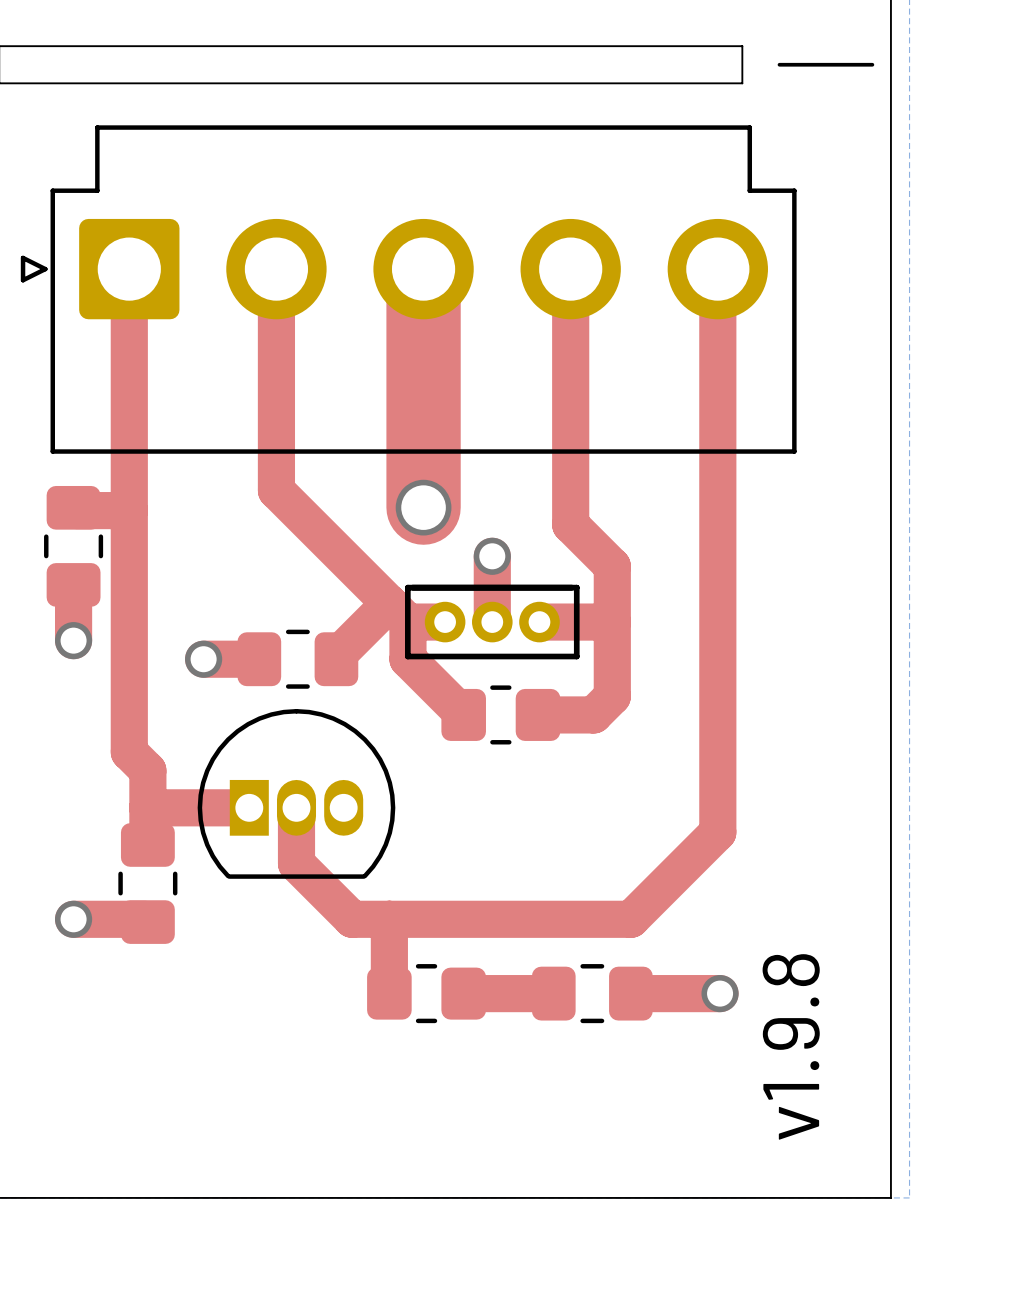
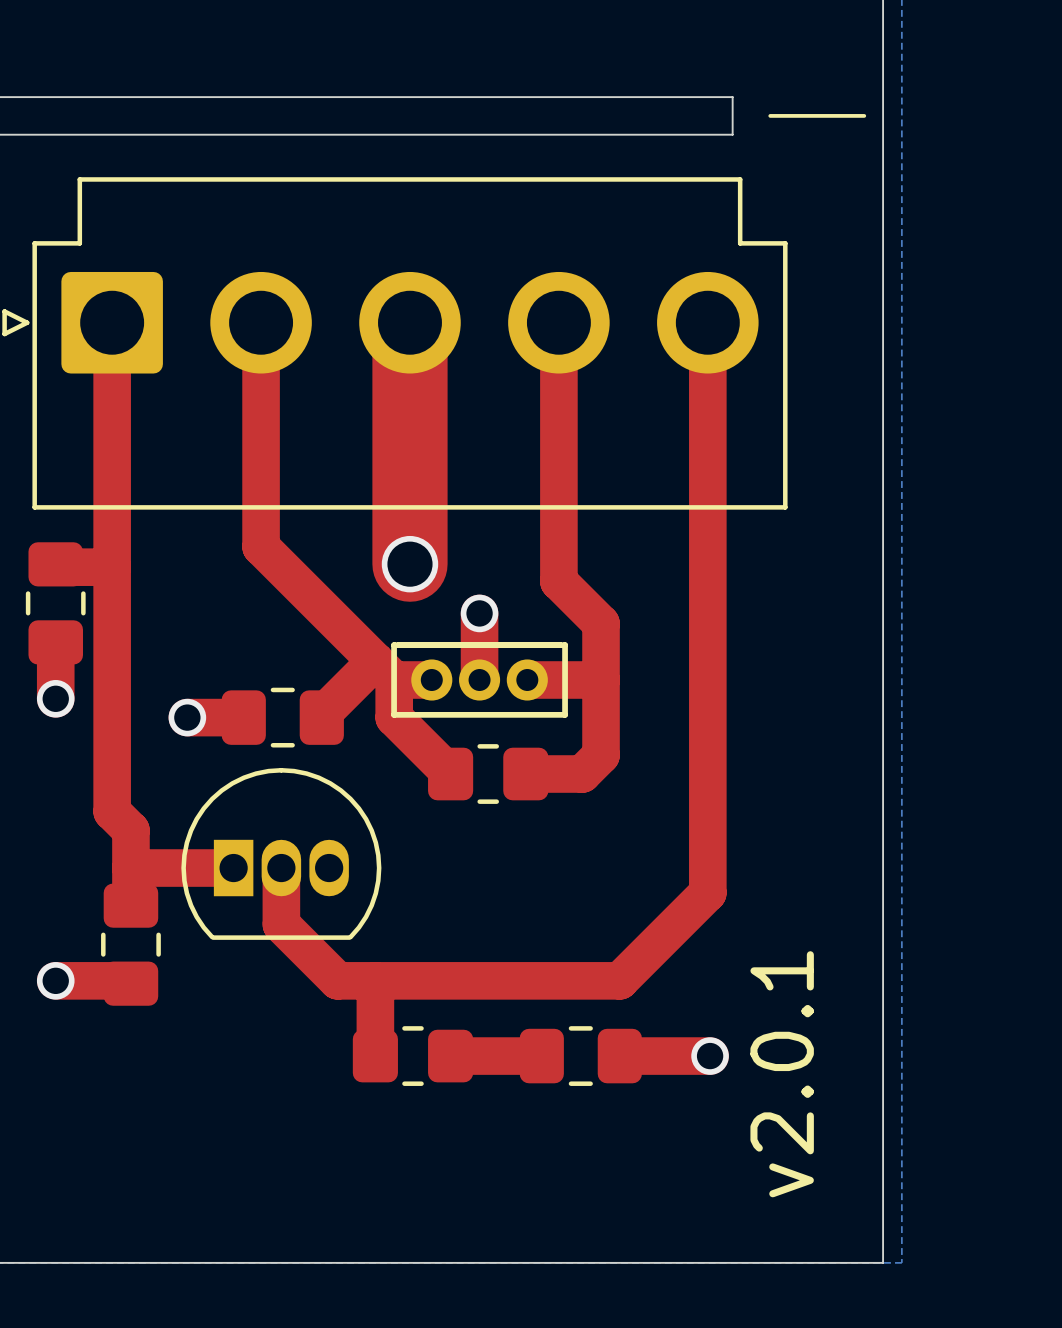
text: v1.9.8 (791, 1046) -> v2.0.1 (782, 1074)

